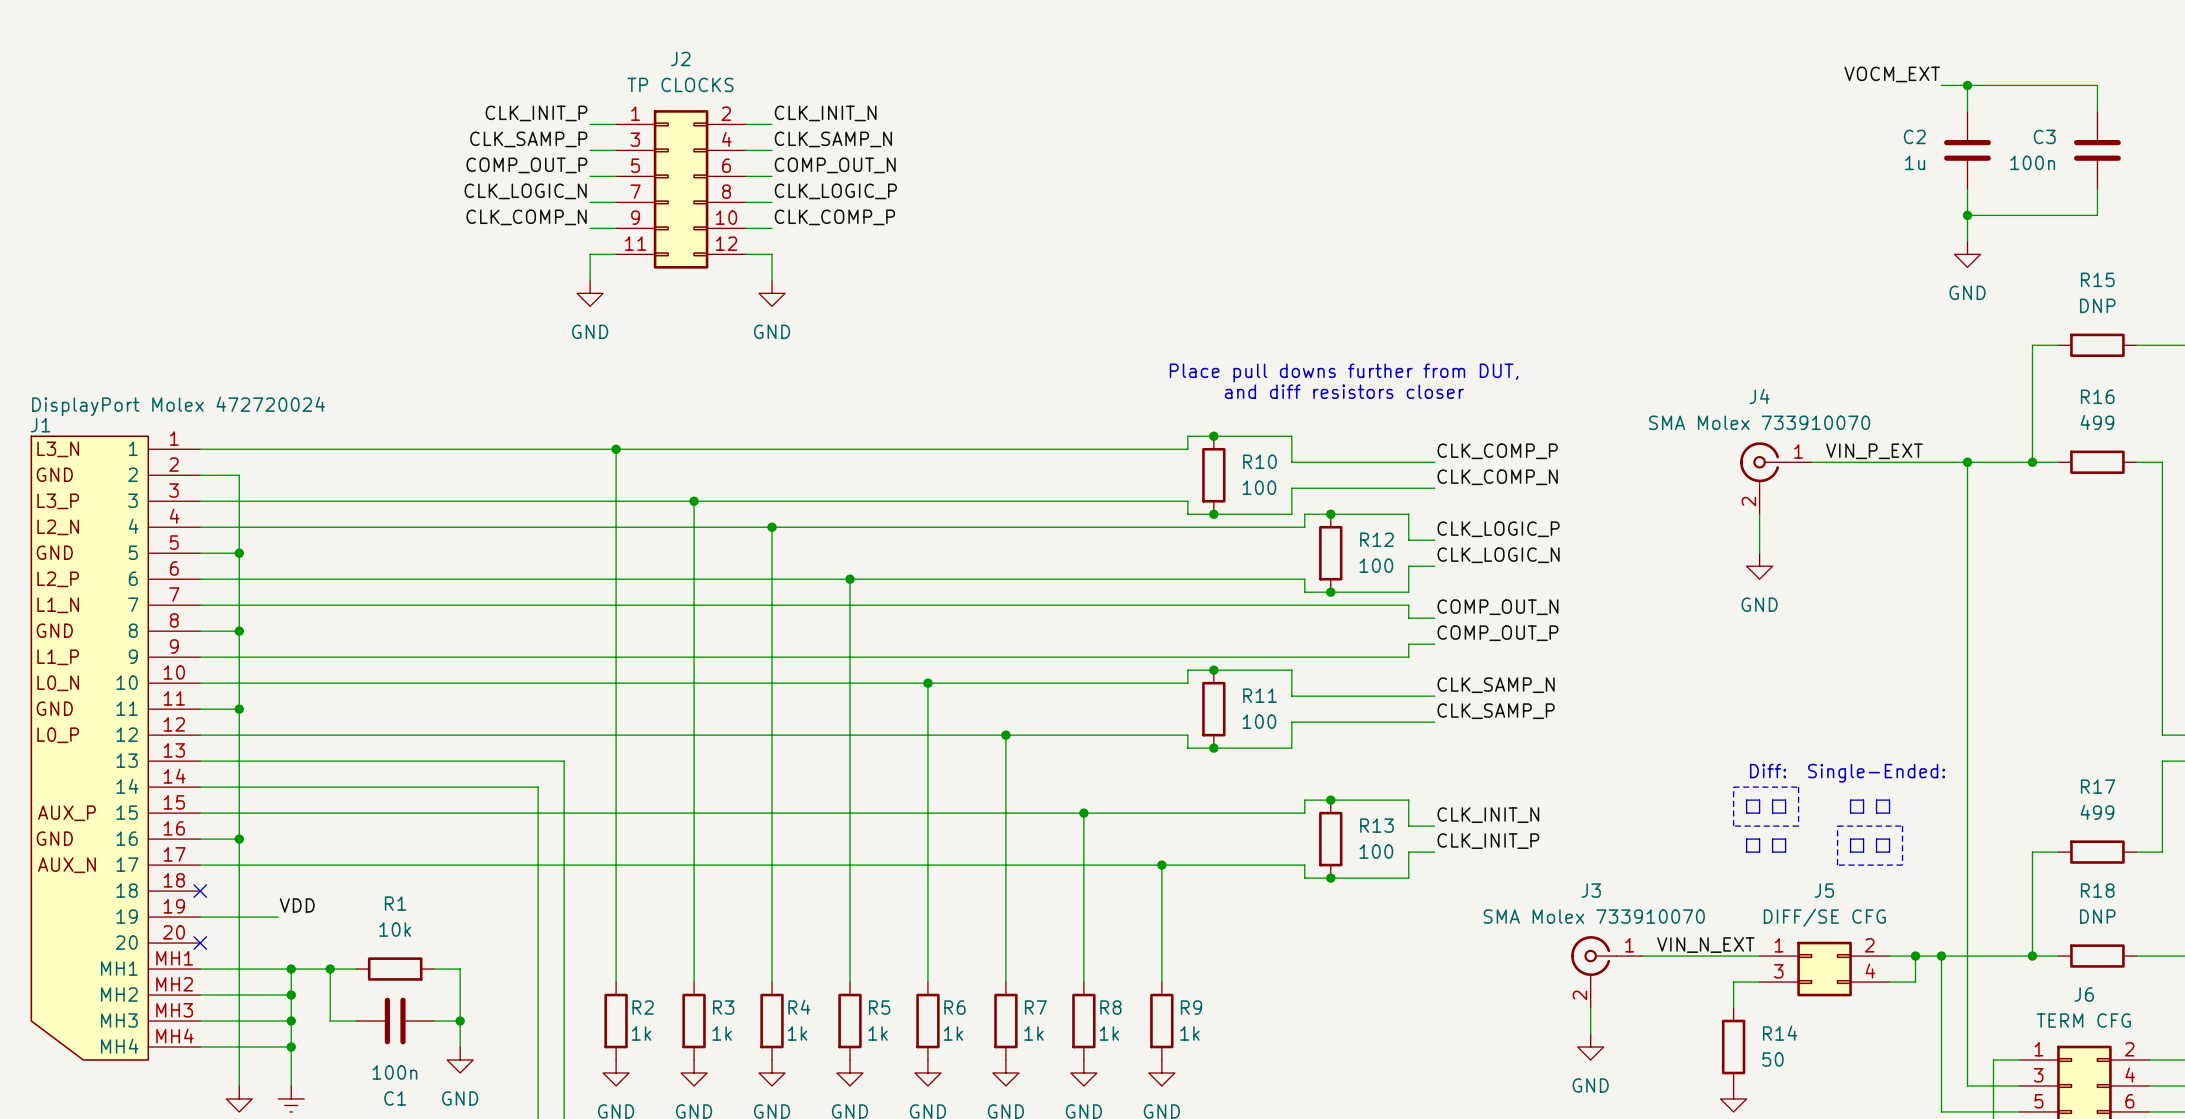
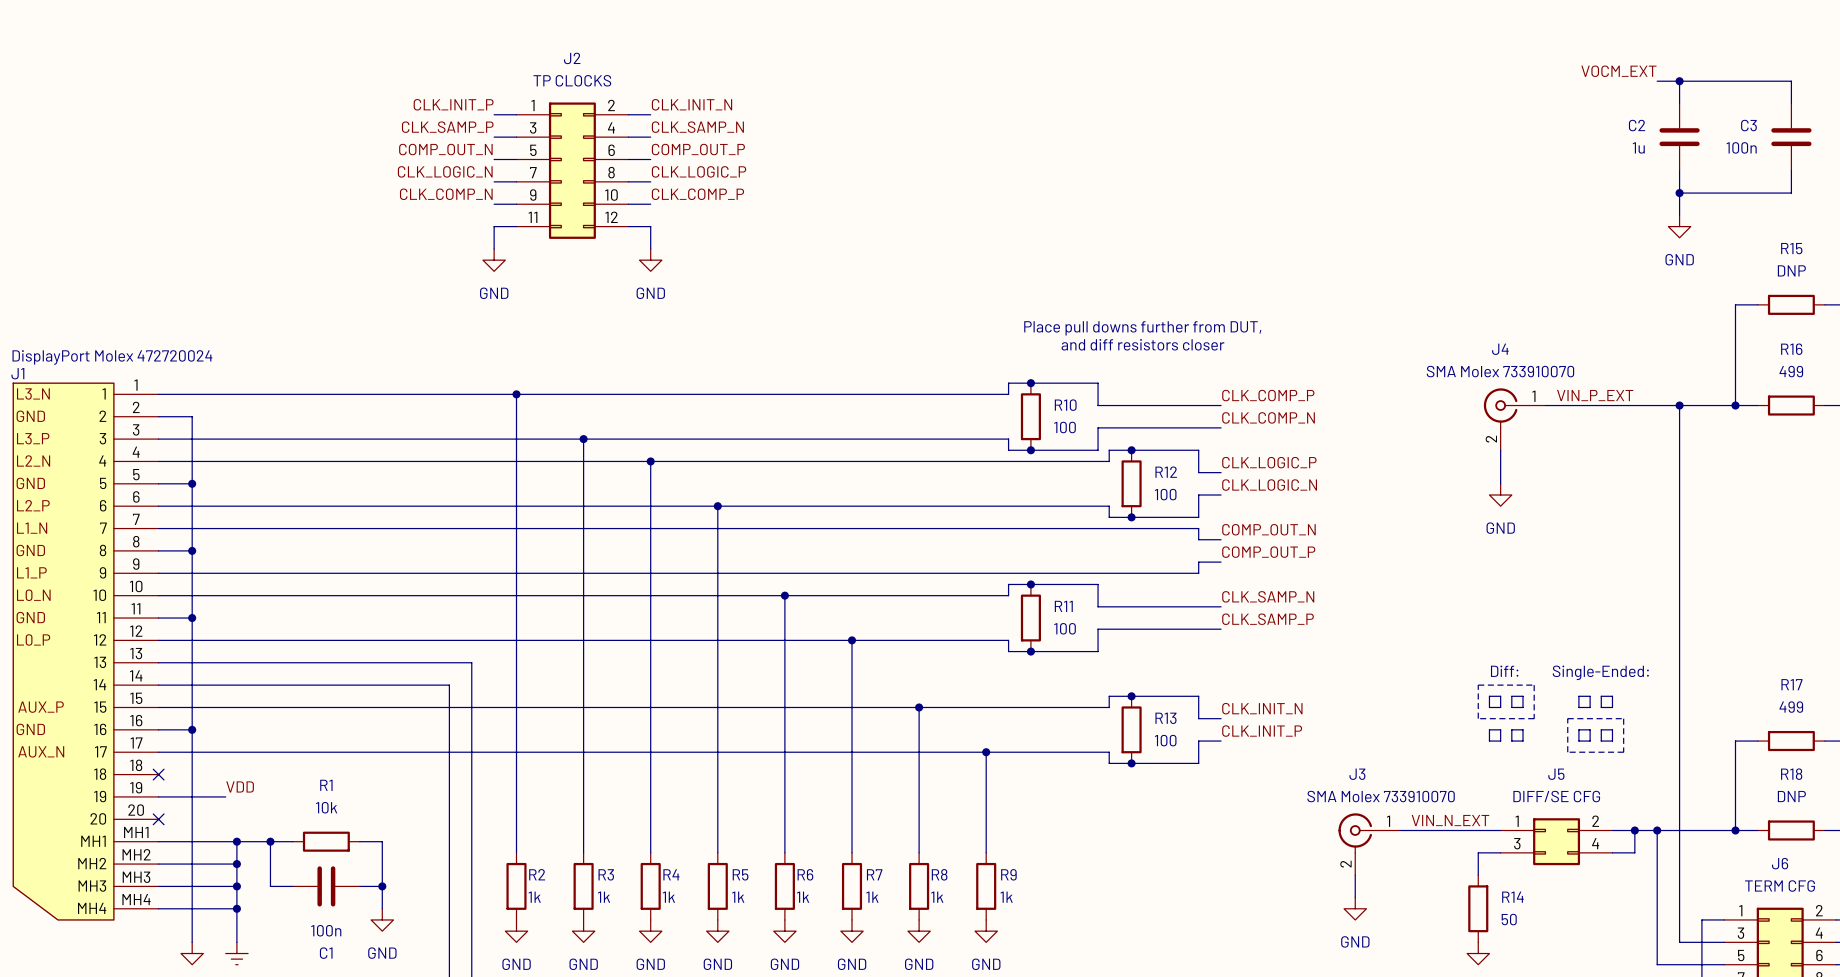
label: COMP_OUT_P (526, 165) -> COMP_OUT_N (445, 149)
label: COMP_OUT_N (835, 165) -> COMP_OUT_P (698, 149)

